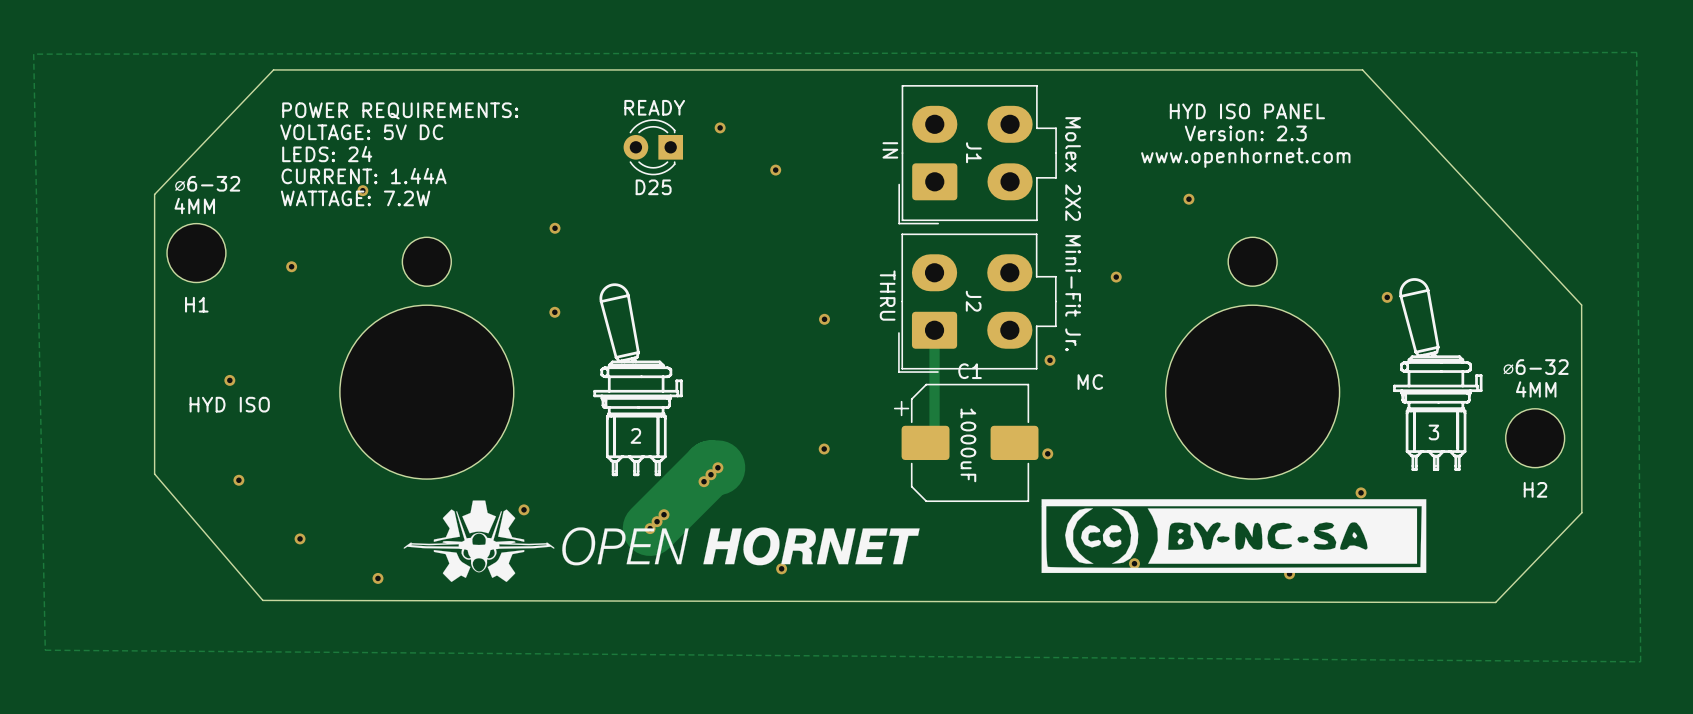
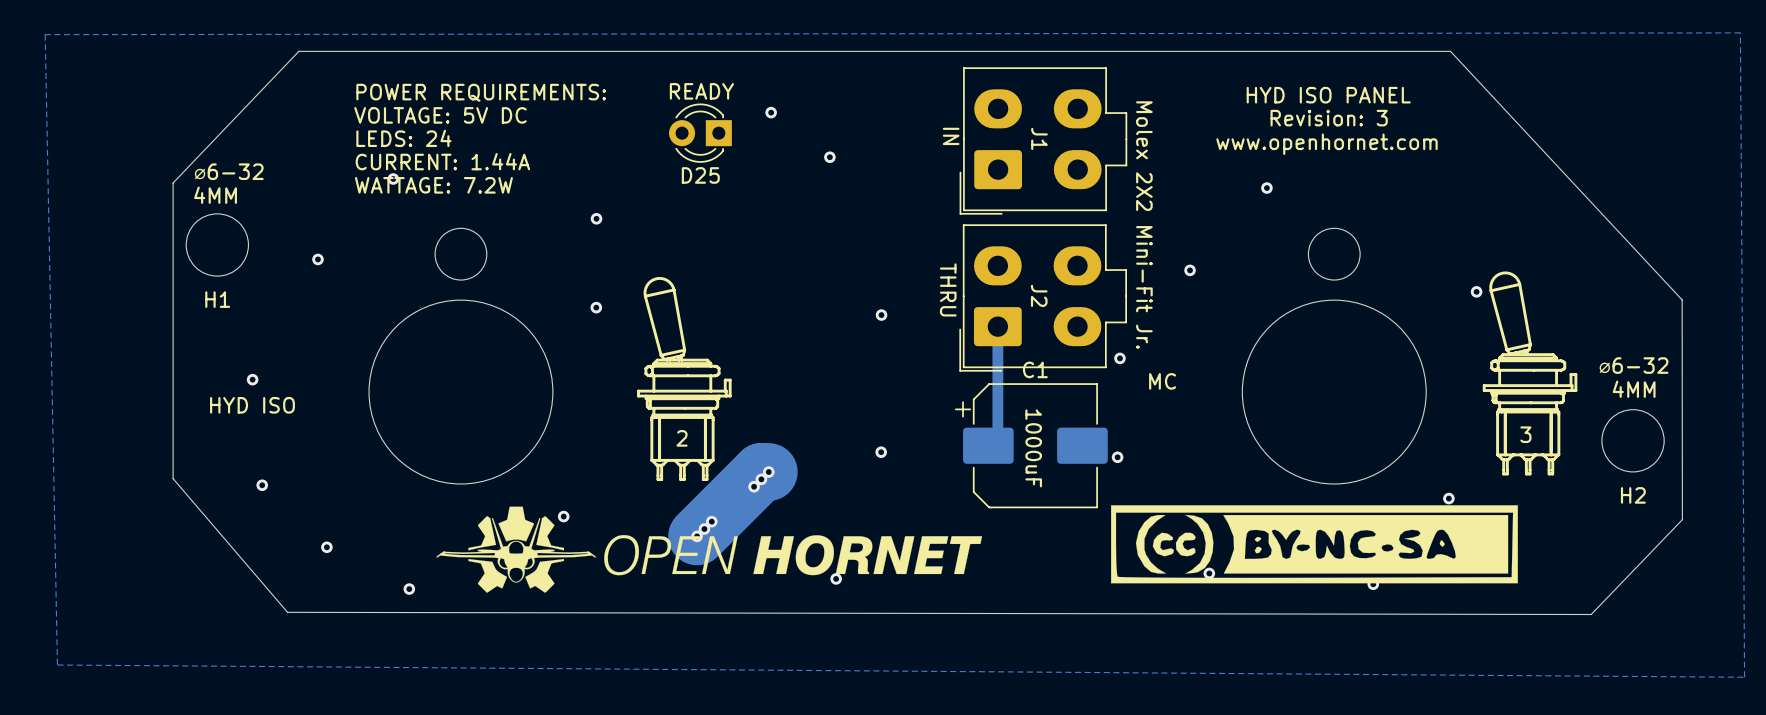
text position: POWER REQUIREMENTS: (400, 110) -> POWER REQUIREMENTS: (481, 92)
text position: VOLTAGE: 5V DC (361, 132) -> VOLTAGE: 5V DC (440, 115)
text: Version: 2.3 (1245, 133) -> Revision: 3 (1329, 118)
text position: LEDS: 24 (327, 154) -> LEDS: 24 (403, 138)
text position: CURRENT: 1.44A (364, 176) -> CURRENT: 1.44A (442, 161)
text position: WATTAGE: 7.2W (355, 198) -> WATTAGE: 7.2W (433, 185)

